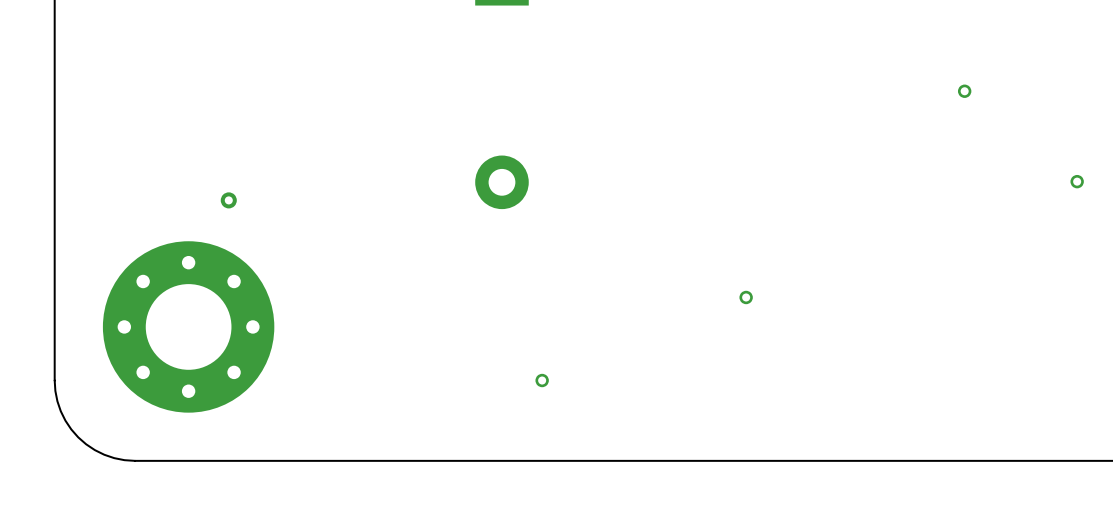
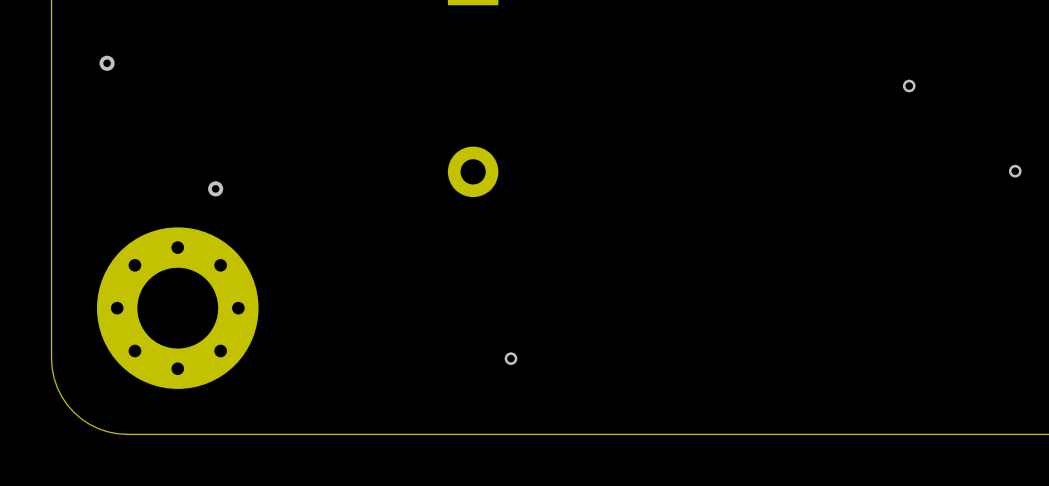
via: none -> (107, 63)
via: (746, 297) -> none

